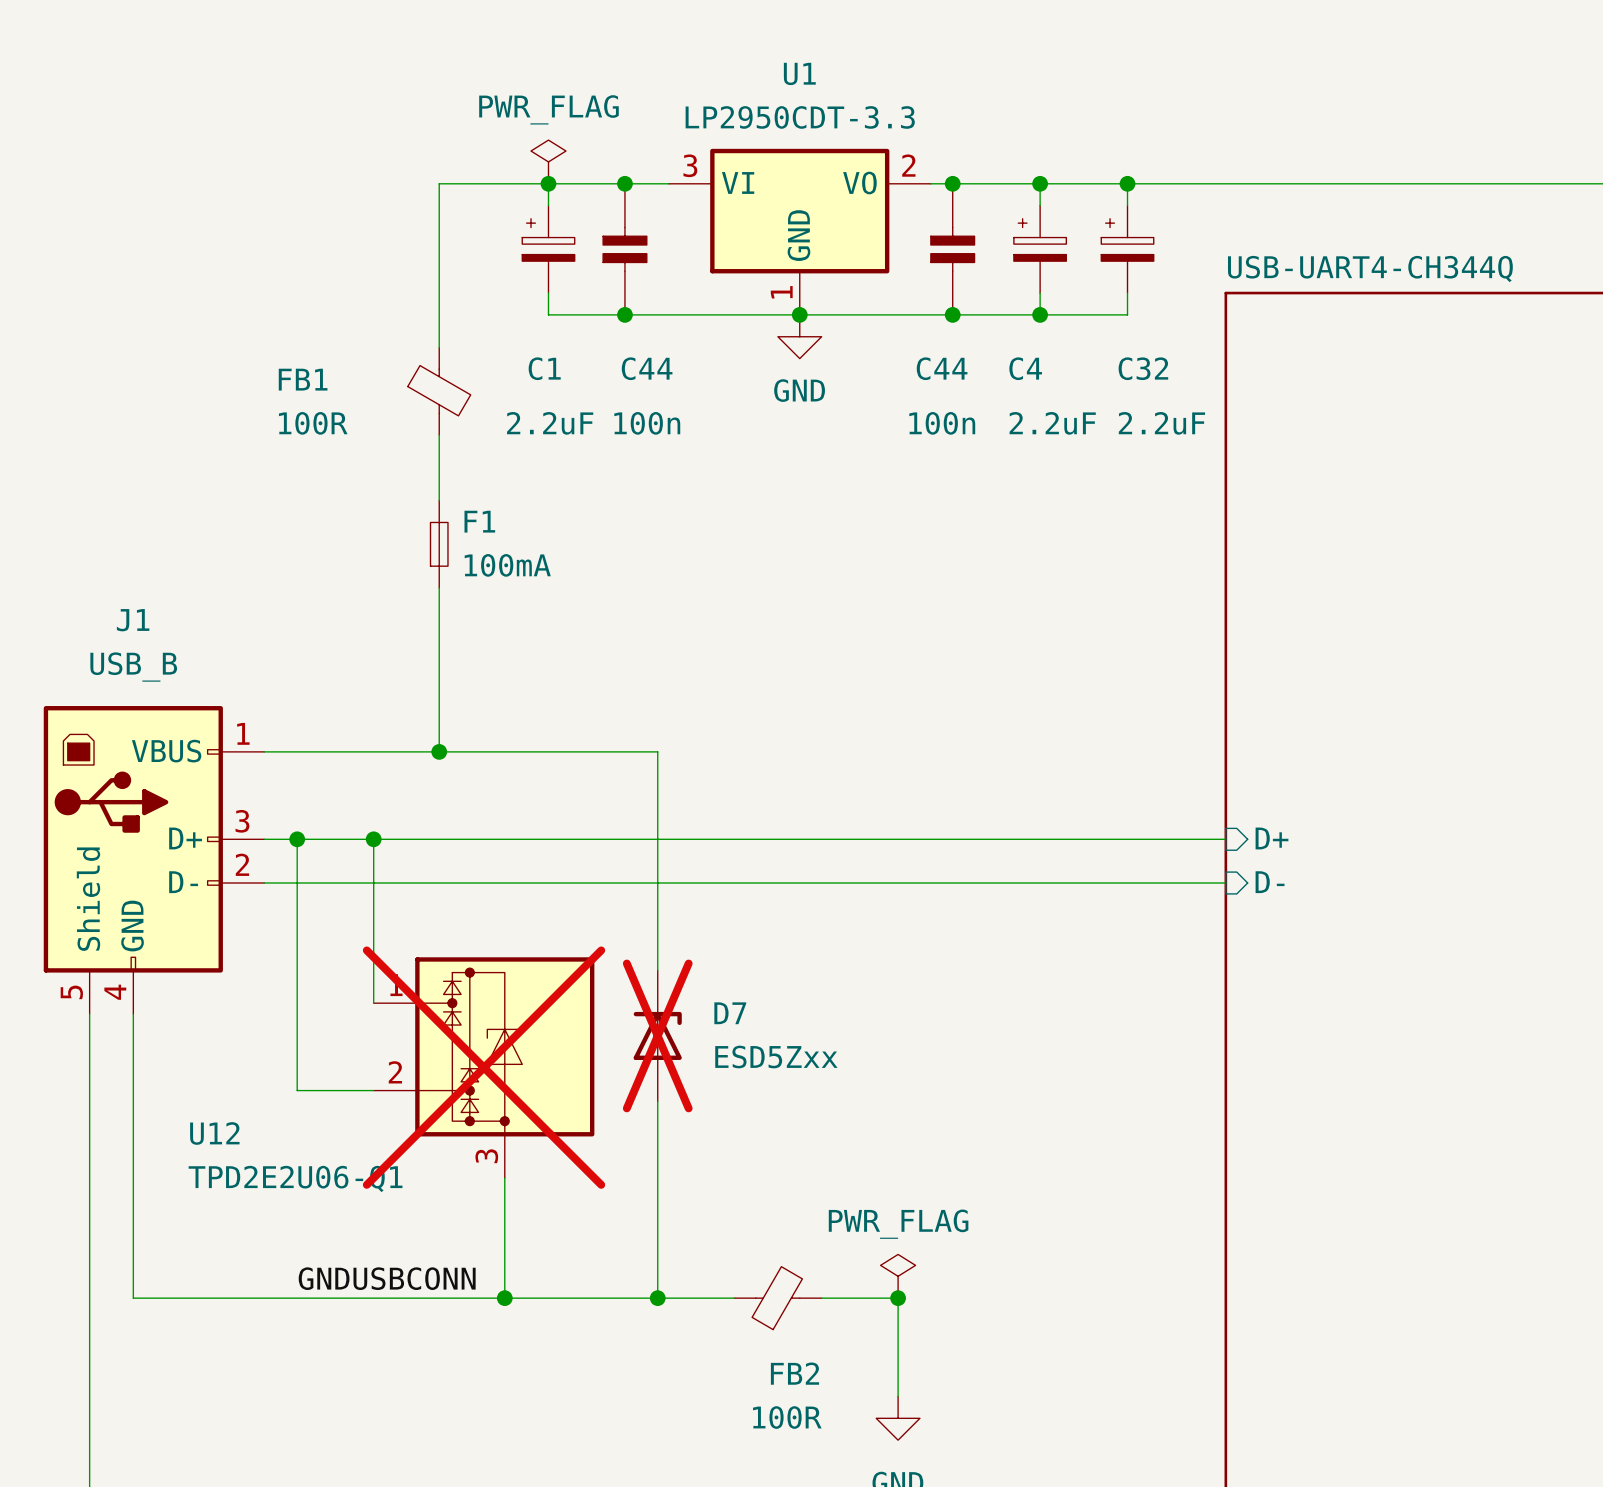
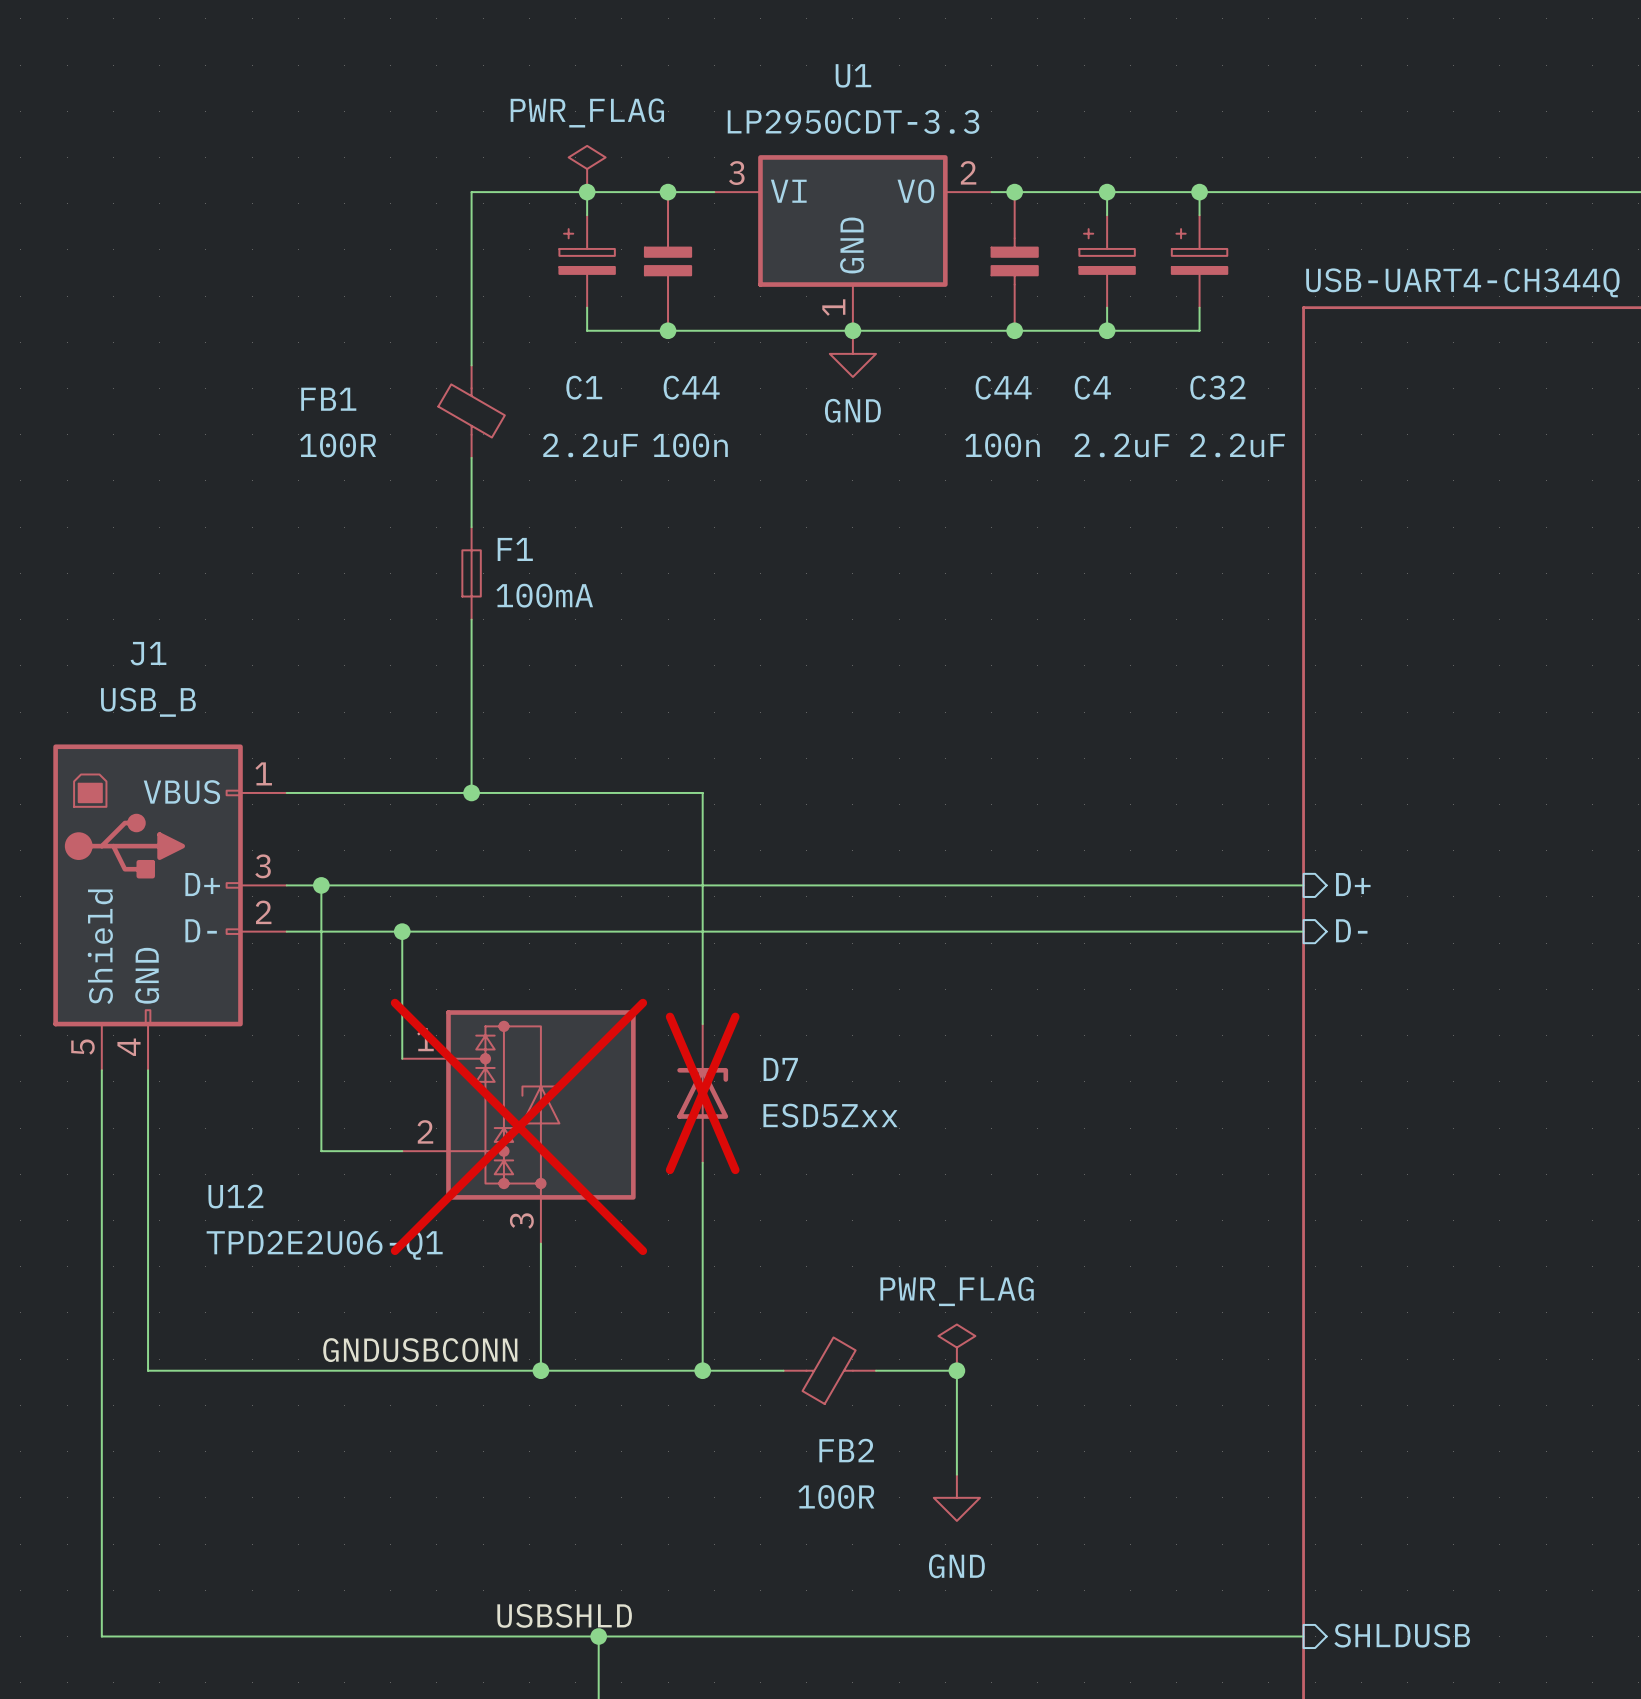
wire: (373, 839) (373, 883) -> none
junction position: (373, 839) -> (402, 931)

